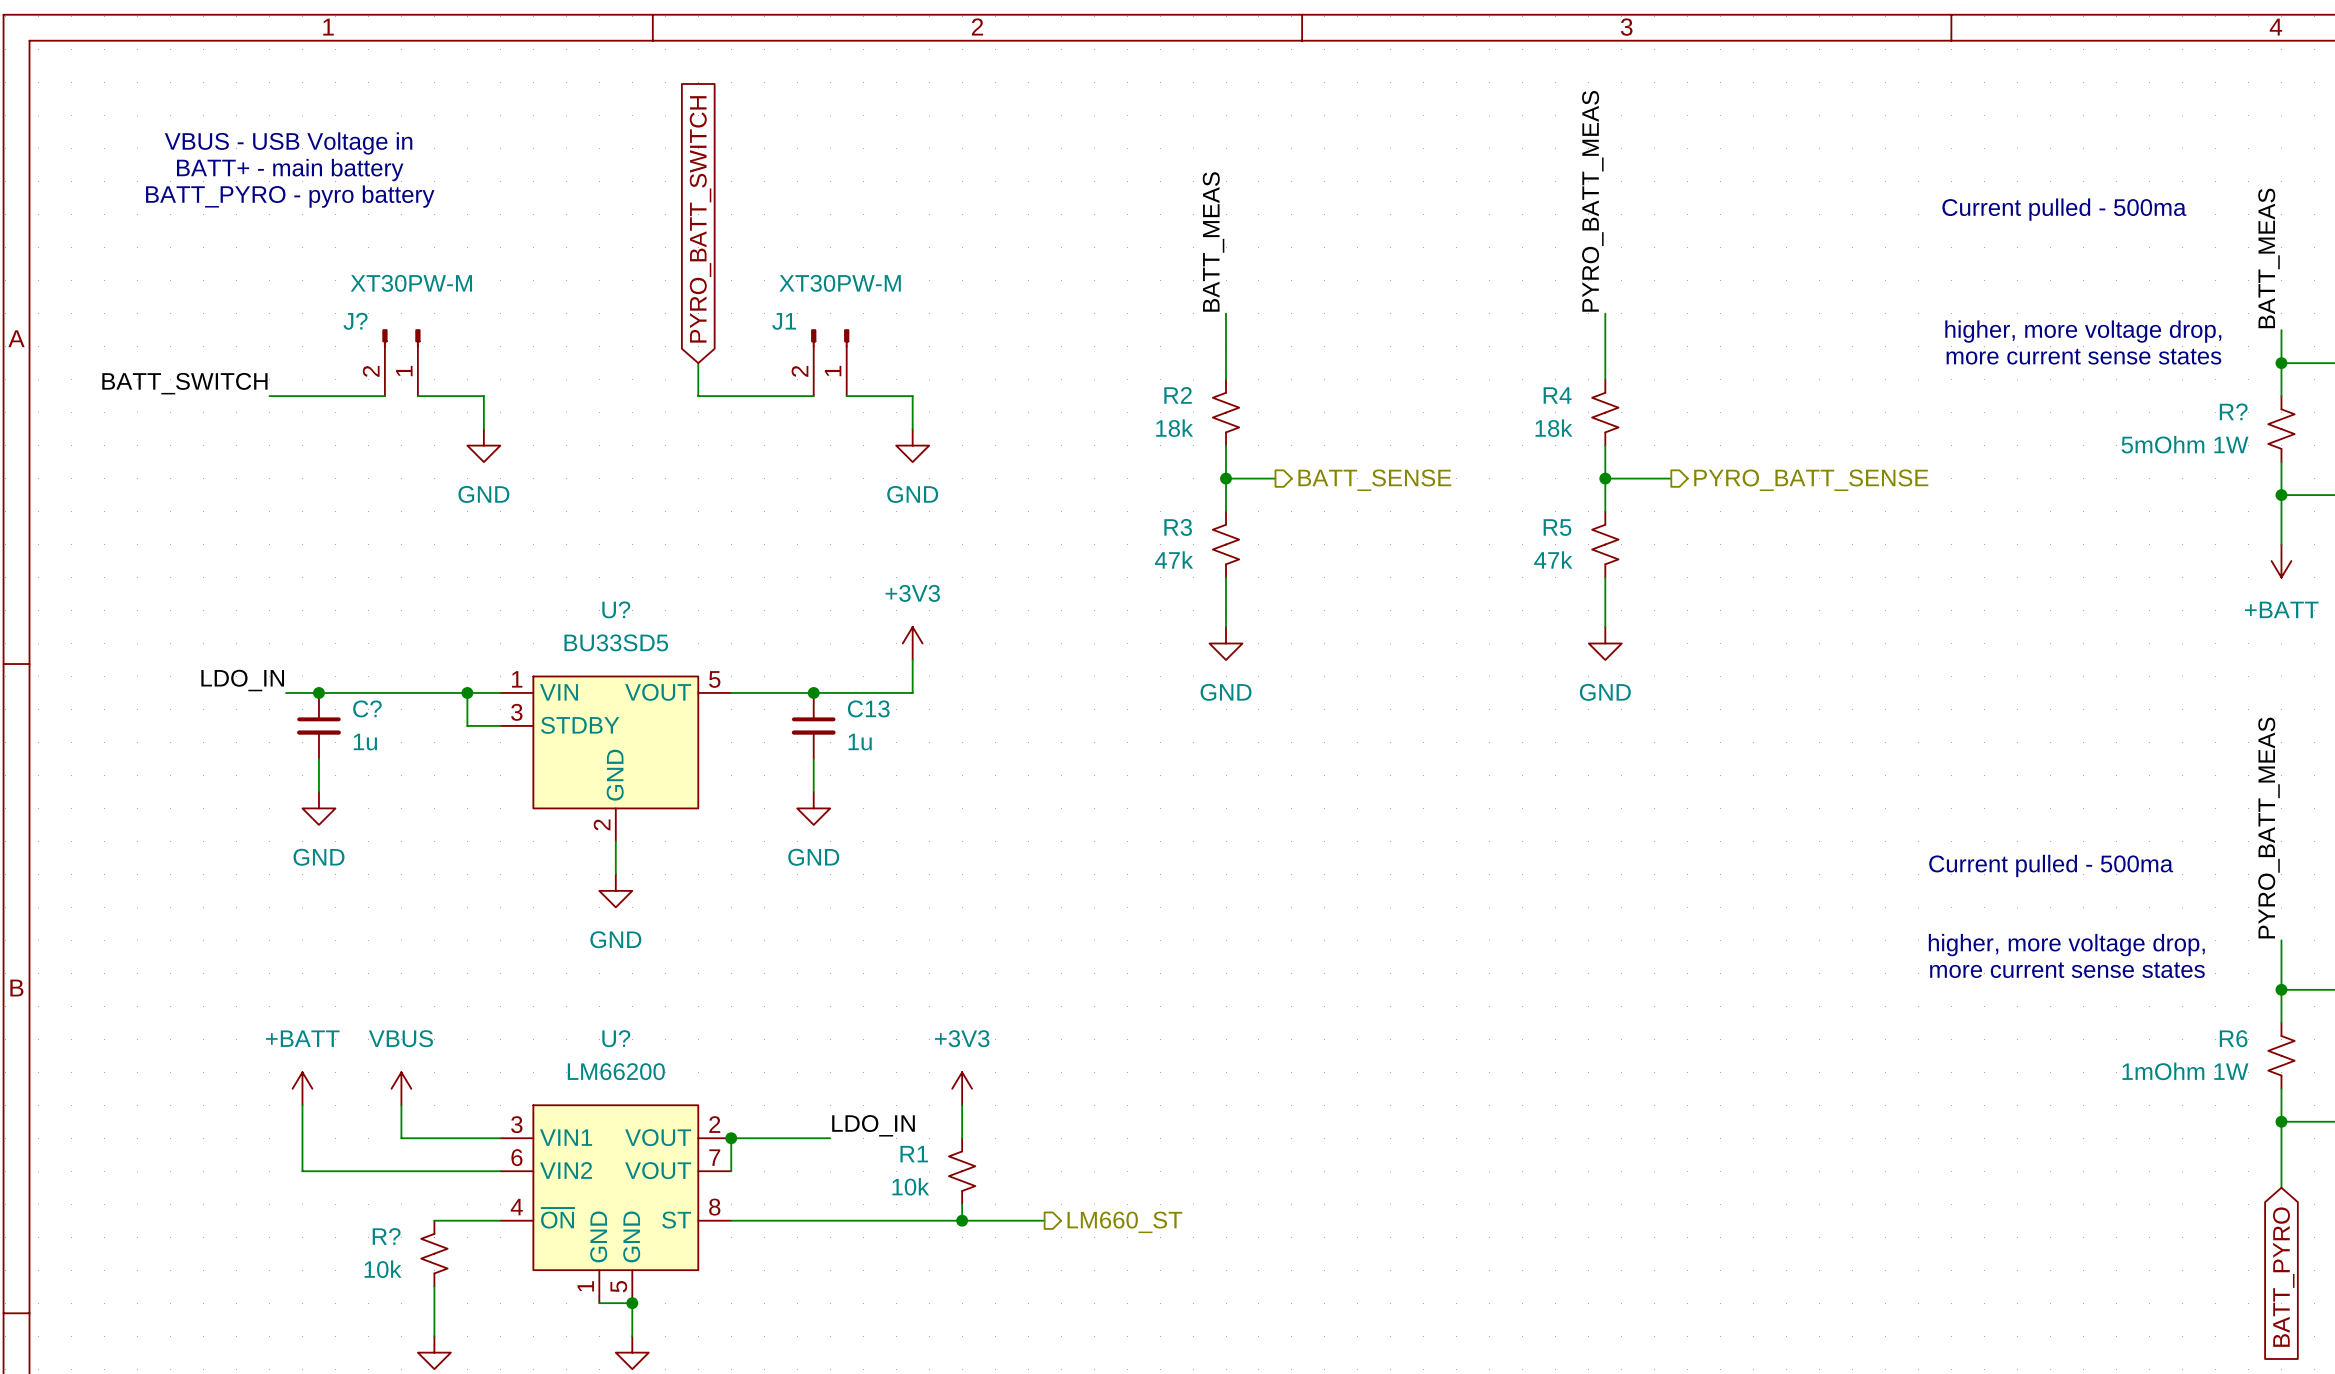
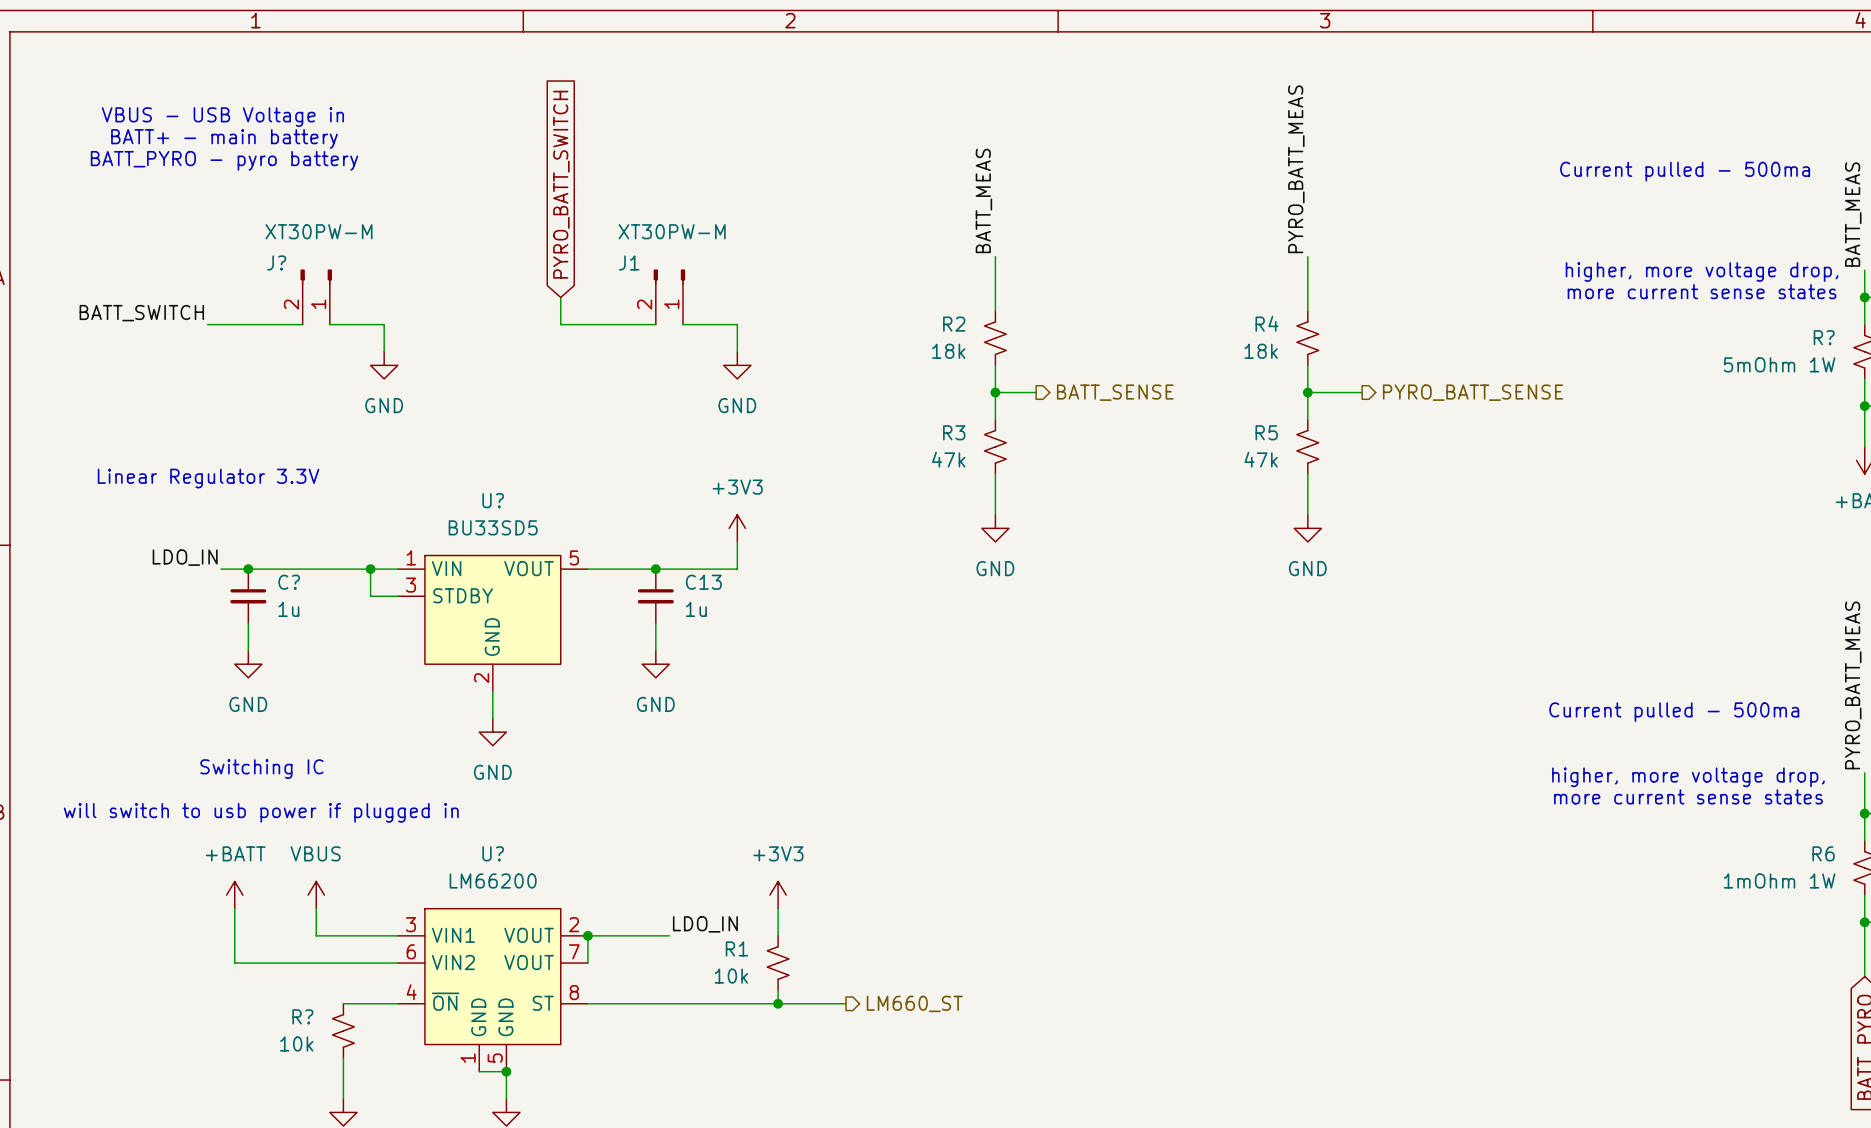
text: none -> Linear Regulator 3.3V (208, 478)
text: none -> Switching IC (261, 769)
text: none -> will switch to usb power if plugged in (261, 812)

